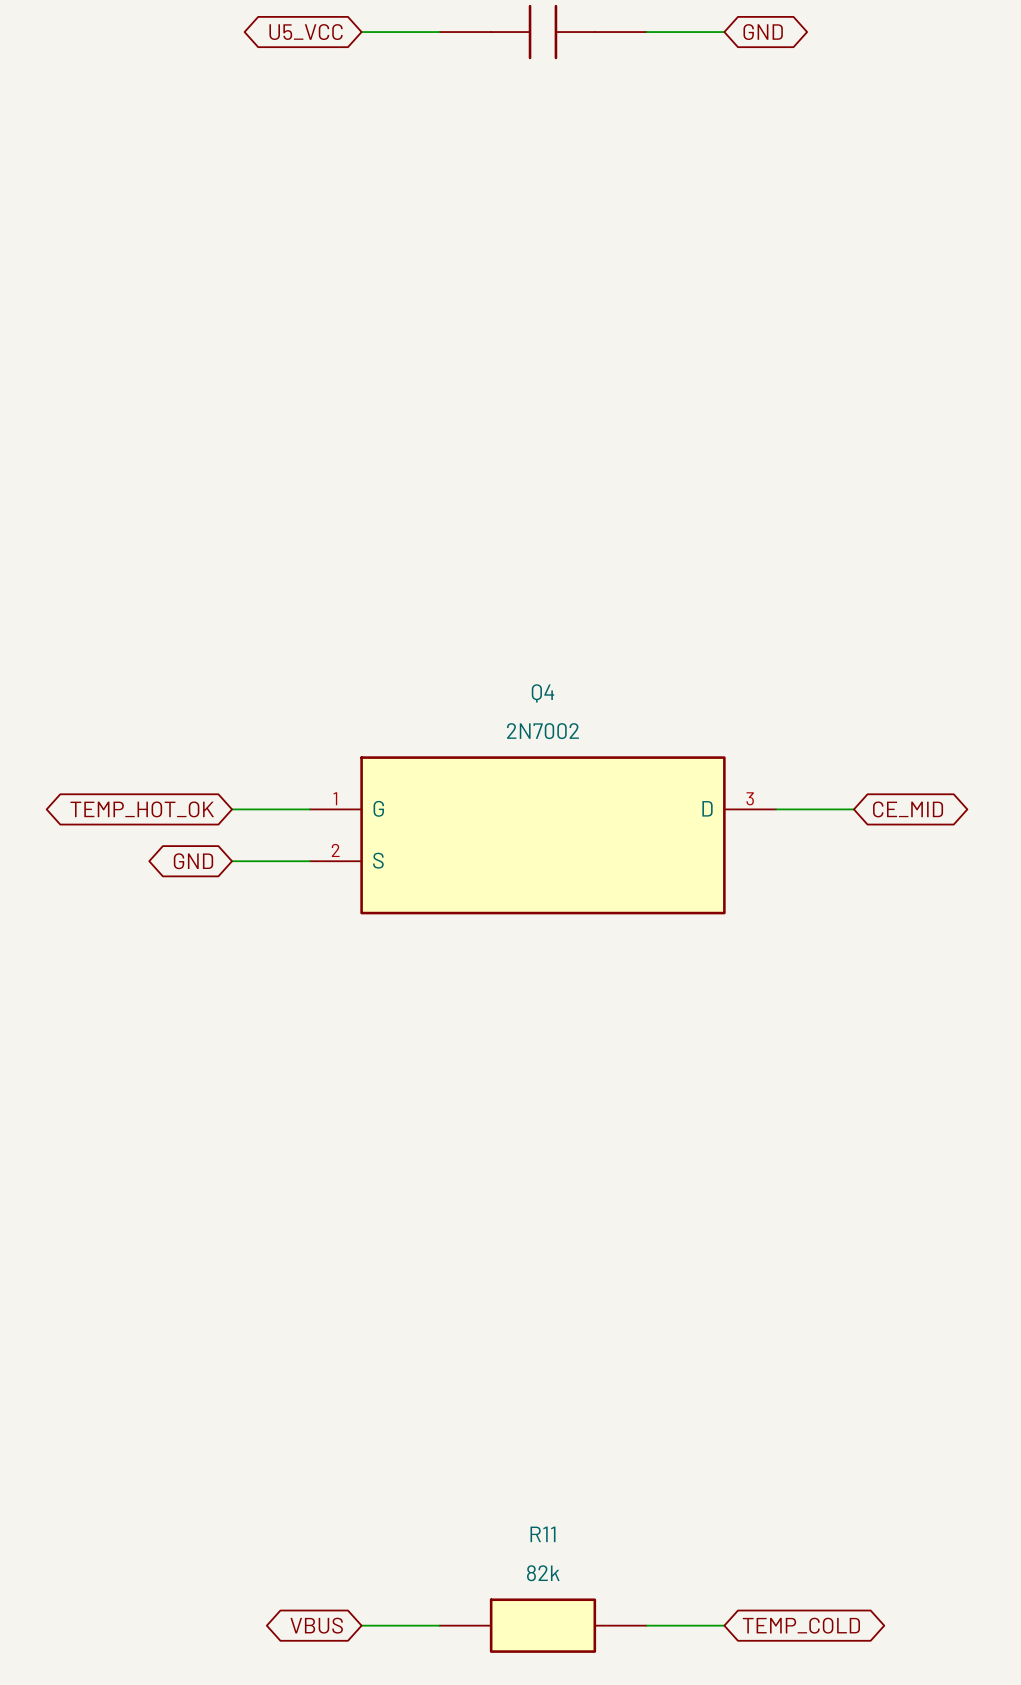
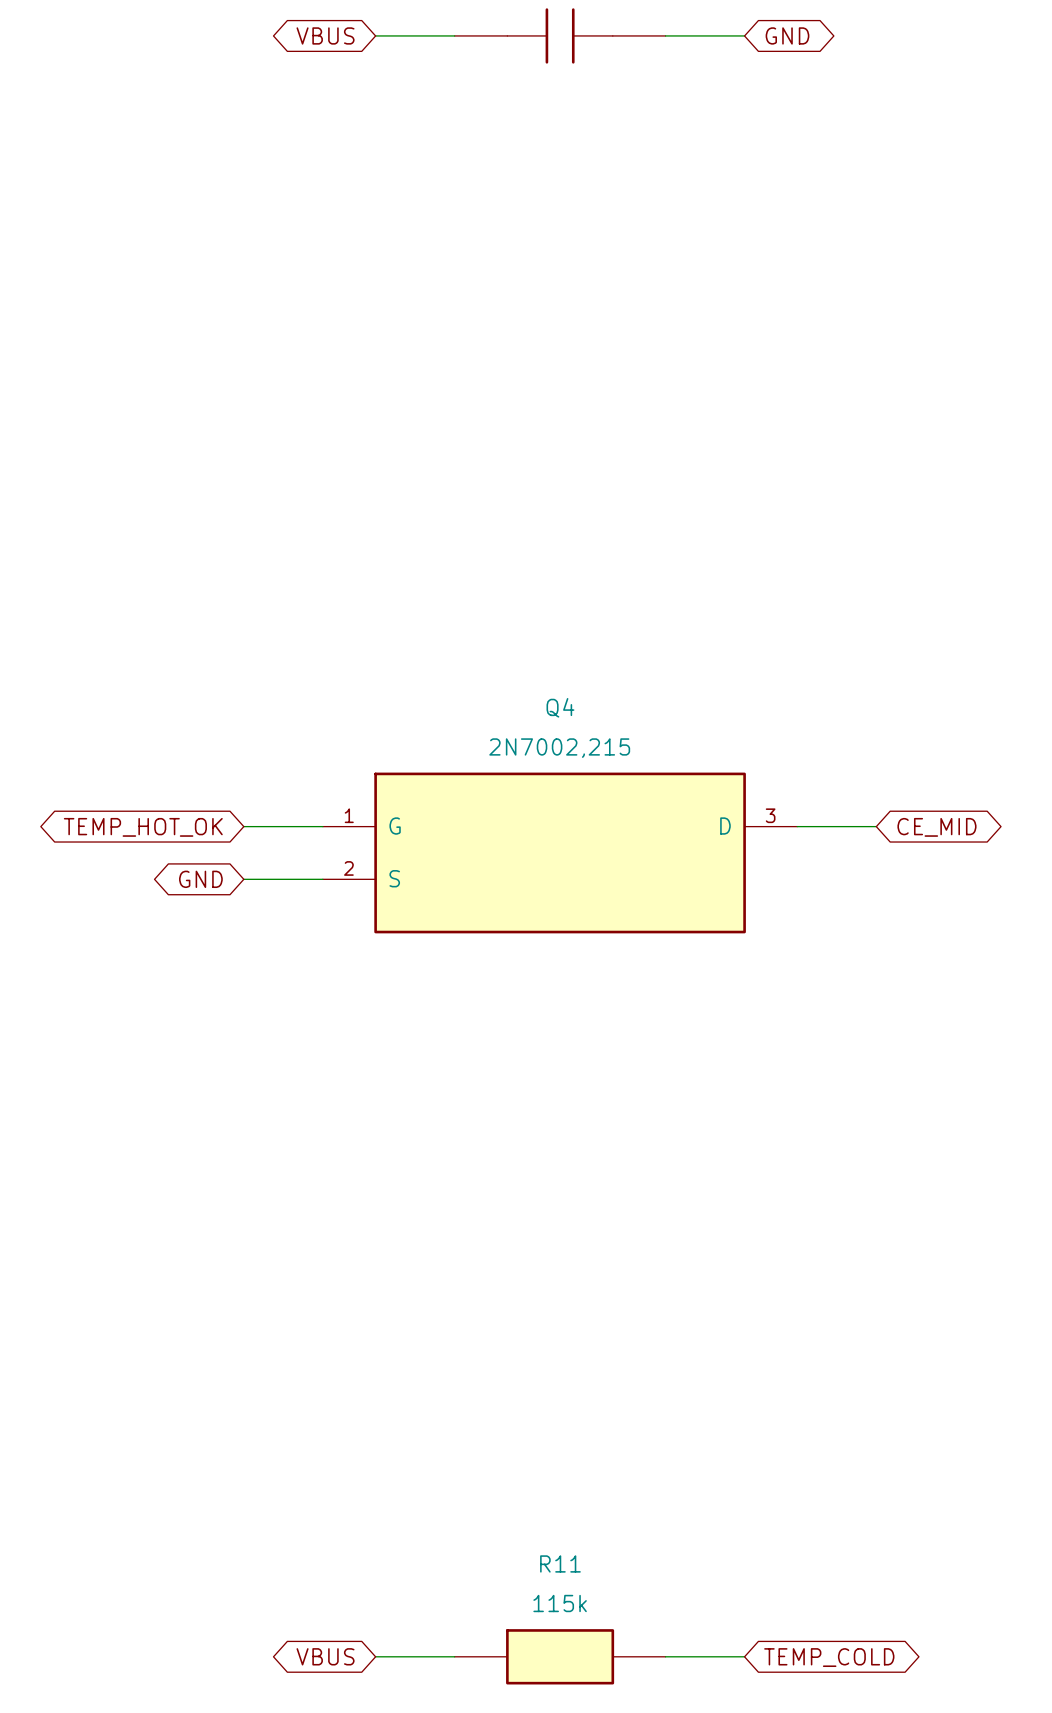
global label: U5_VCC (306, 32) -> VBUS (325, 35)
Q4 text: 2N7002 (542, 731) -> 2N7002,215 (559, 748)
R11 value: 82k (543, 1573) -> 115k (560, 1603)

